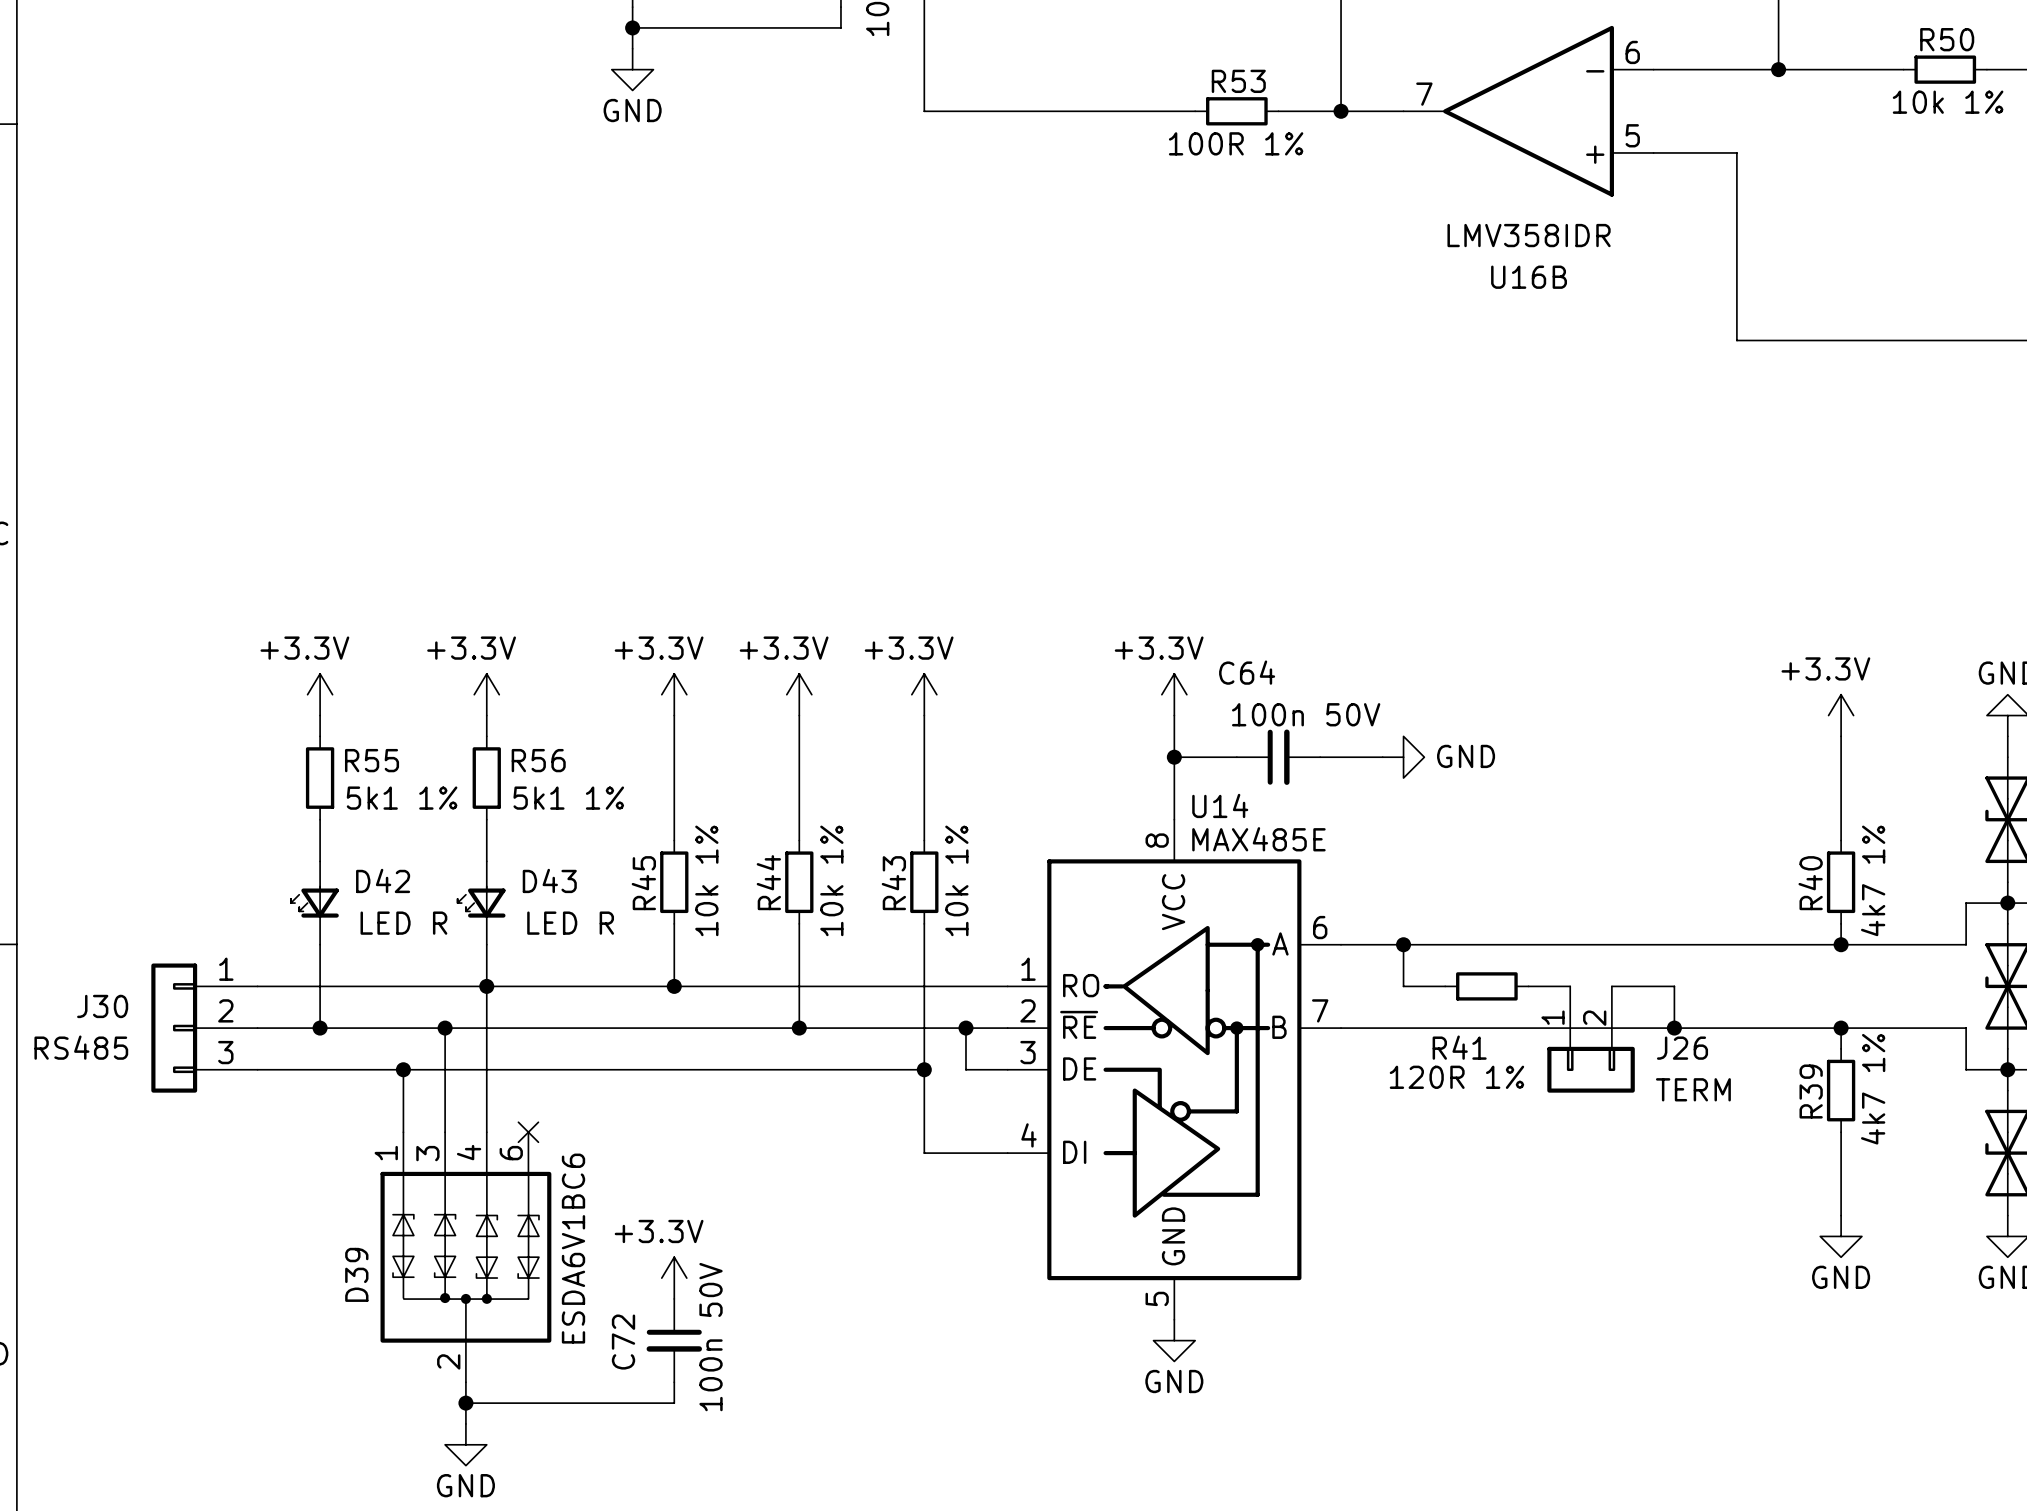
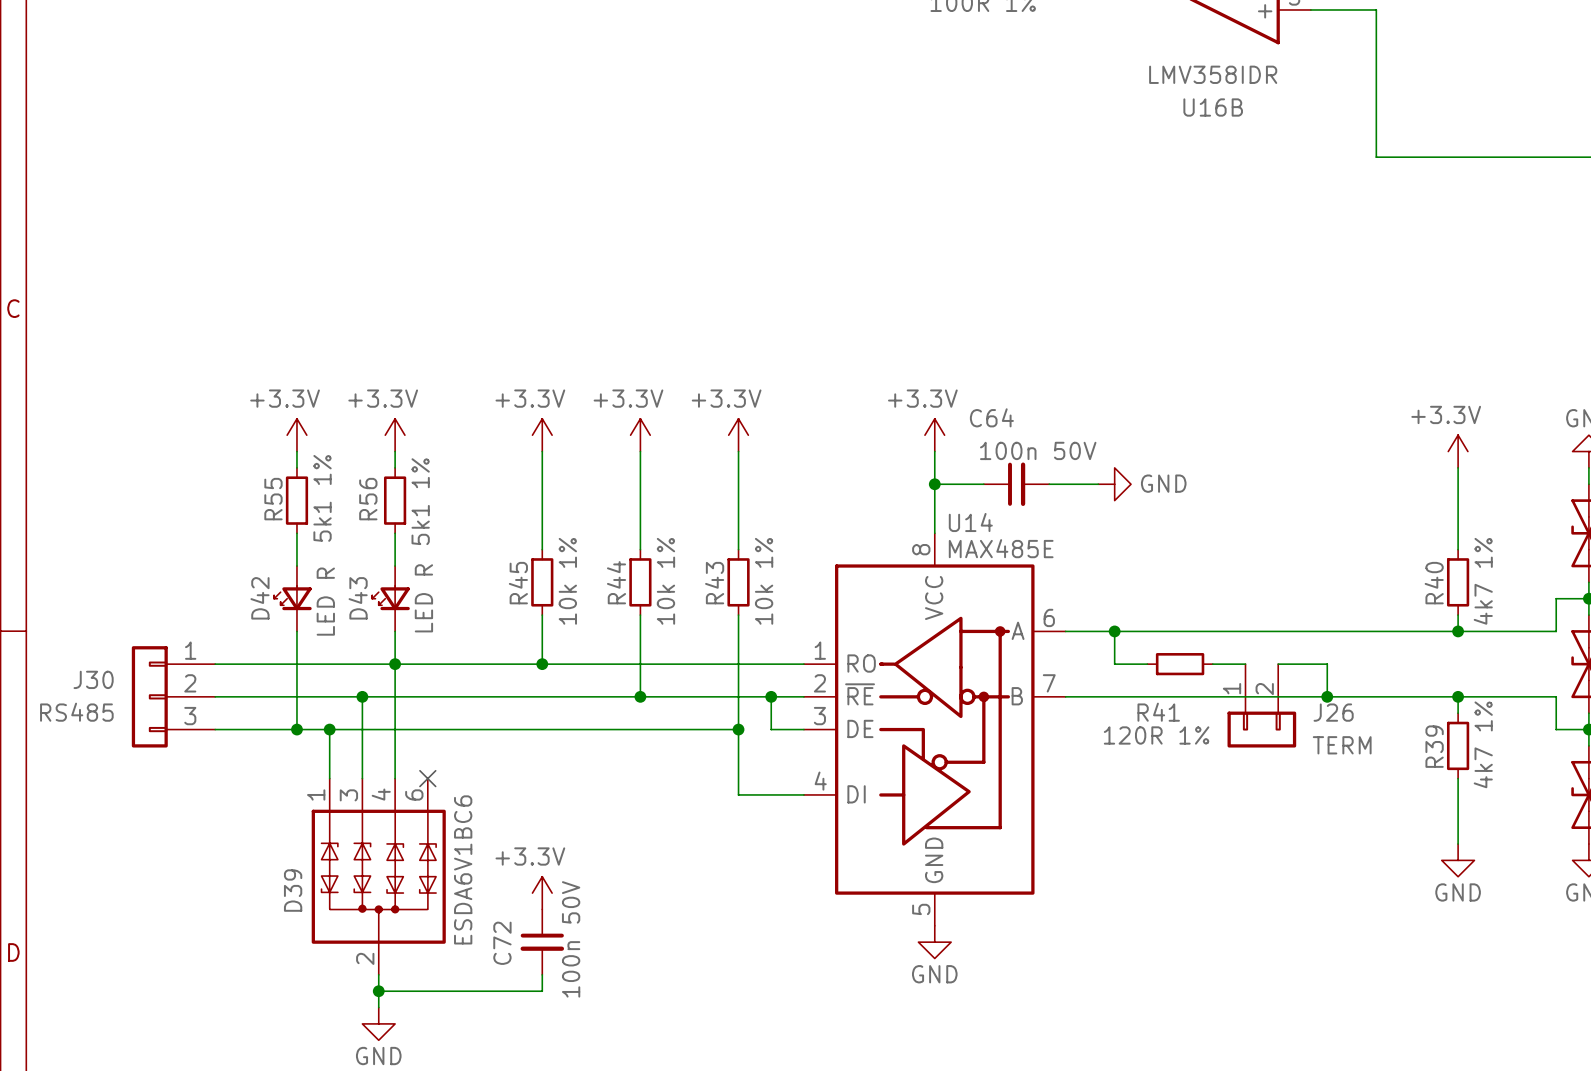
power symbol position: +3.3V (320, 694) -> +3.3V (296, 435)
wire: (320, 715) (320, 736) -> (296, 451) (296, 467)
R55 name rotation: 0° (372, 760) -> 90° counterclockwise (273, 499)
R56 name rotation: 0° (538, 760) -> 90° counterclockwise (368, 499)
R56 name position: R56 (538, 760) -> R56 (368, 499)
R55 position: (320, 778) -> (296, 500)
R55 value rotation: 0° (402, 798) -> 90° counterclockwise (322, 498)
R56 value rotation: 0° (568, 798) -> 90° counterclockwise (420, 501)
wire: (320, 819) (320, 861) -> (296, 533) (296, 566)
D42 name rotation: 0° (383, 880) -> 90° counterclockwise (260, 598)
D43 name rotation: 0° (549, 880) -> 90° counterclockwise (358, 598)
D43 name position: D43 (549, 880) -> D43 (358, 598)
D42 position: (314, 903) -> (292, 598)
D42 value rotation: 0° (403, 923) -> 90° counterclockwise (325, 601)
D43 value rotation: 0° (570, 923) -> 90° counterclockwise (423, 598)
wire: (320, 944) (320, 1028) -> none
wire: none -> (296, 631) (296, 729)
junction position: (320, 1028) -> (296, 729)

